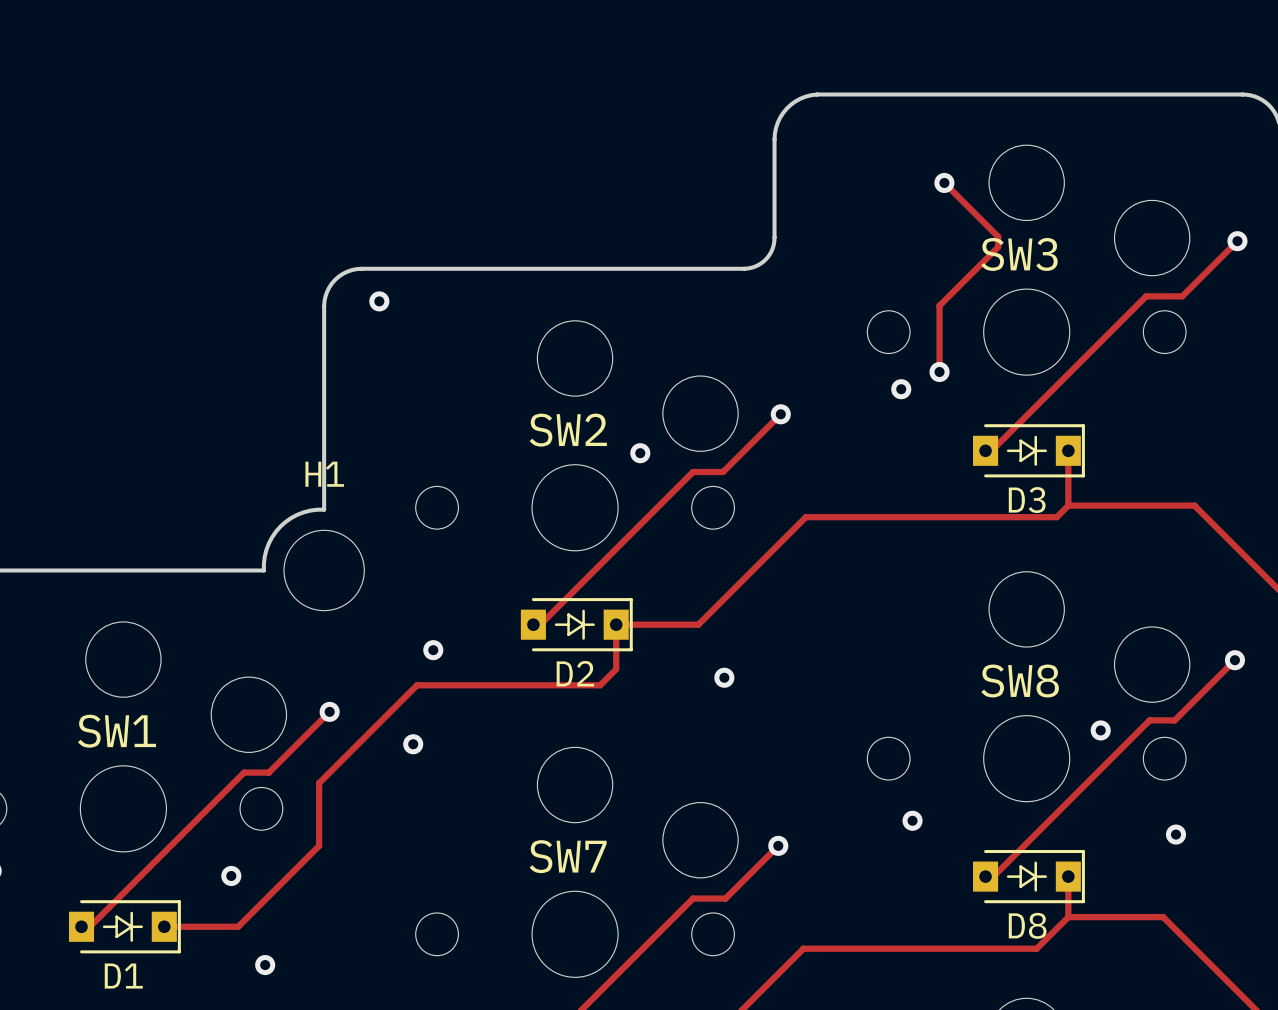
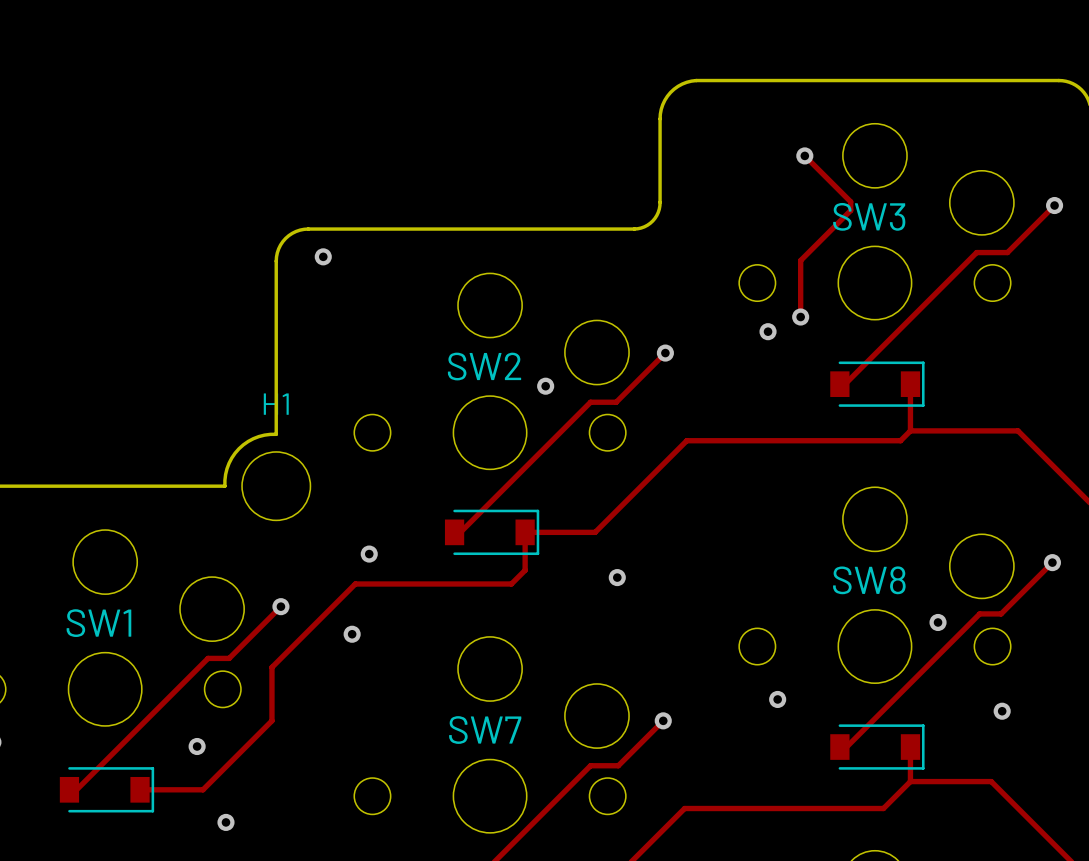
D3: (1028, 450) -> none
part: none -> (877, 384)
D2: (576, 624) -> none
part: none -> (492, 532)
D8: (1028, 876) -> none
part: none -> (877, 747)
D1: (124, 926) -> none
part: none -> (106, 789)

